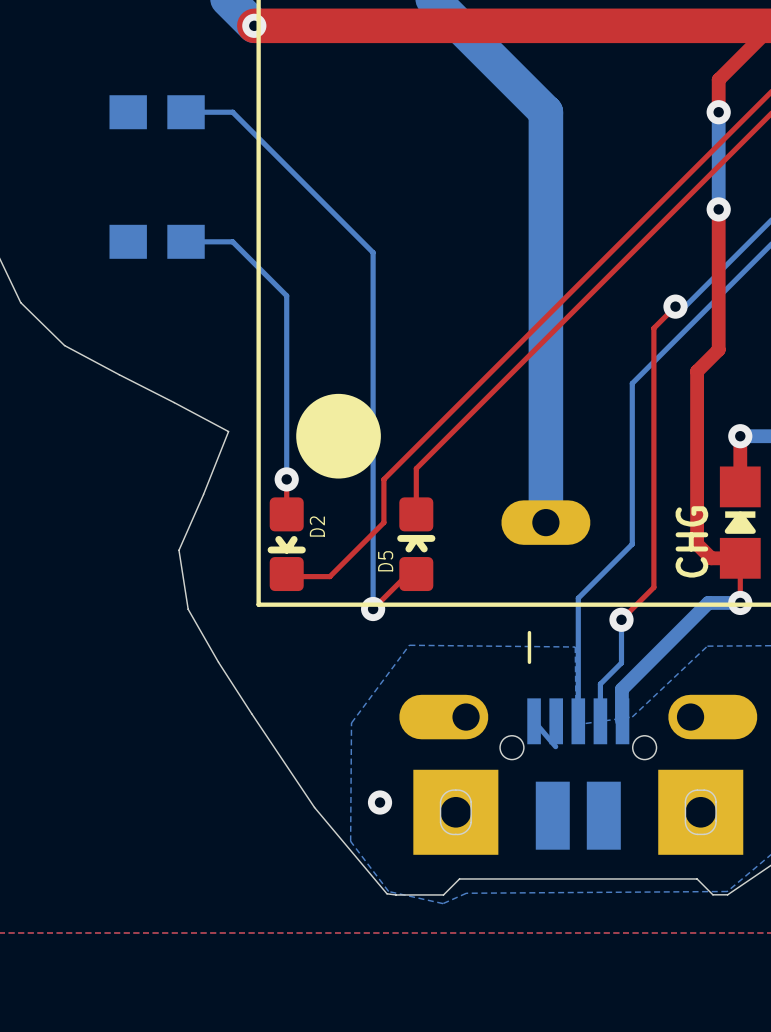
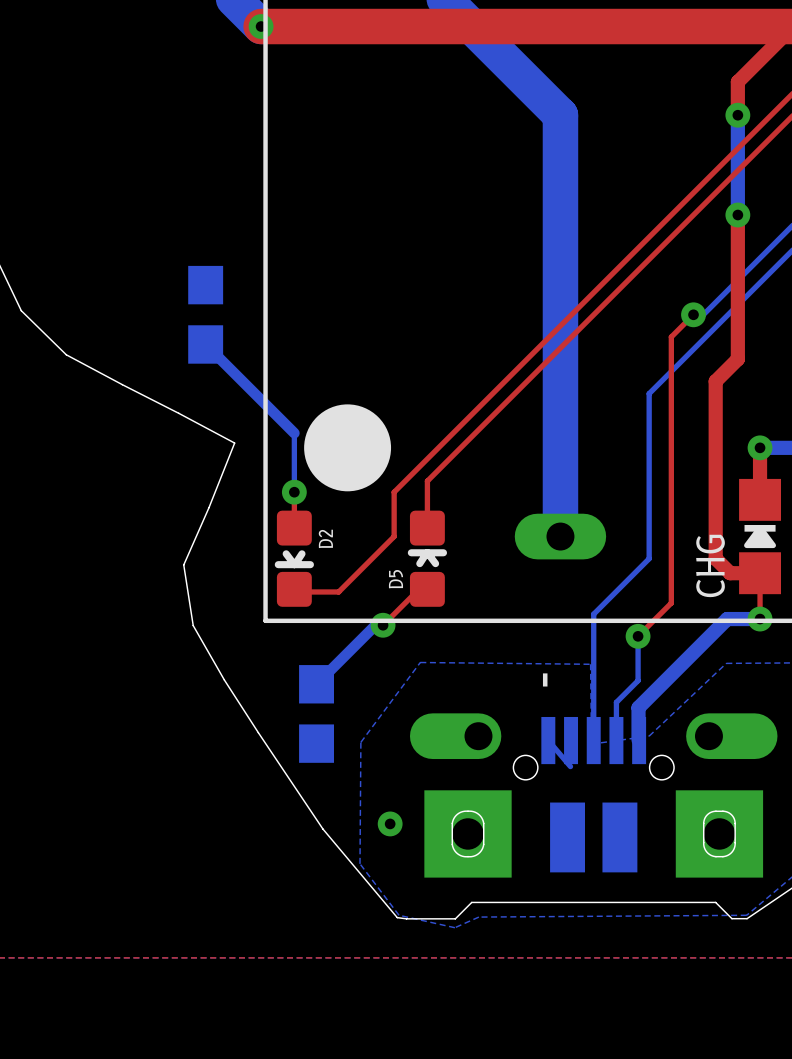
part: (157, 112) -> none
bottom track: (186, 112) (232, 112) (373, 252) (373, 609) -> (316, 684) (375, 625) (383, 625)
part rotation: 0° (157, 241) -> 90° clockwise (205, 314)
part position: (157, 241) -> (205, 314)
bottom track: (186, 241) (232, 241) (286, 295) (286, 421) -> (205, 344) (294, 433)
part: none -> (316, 713)

